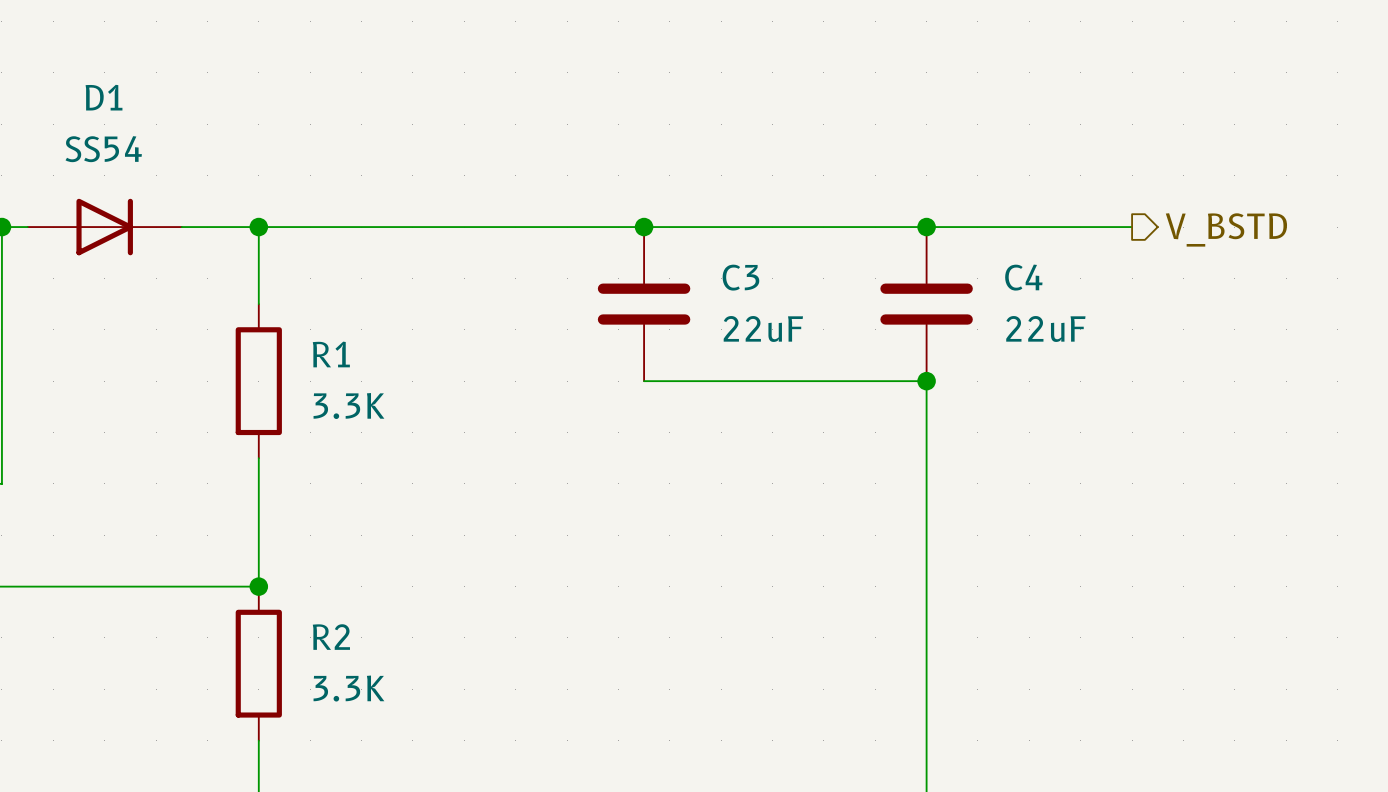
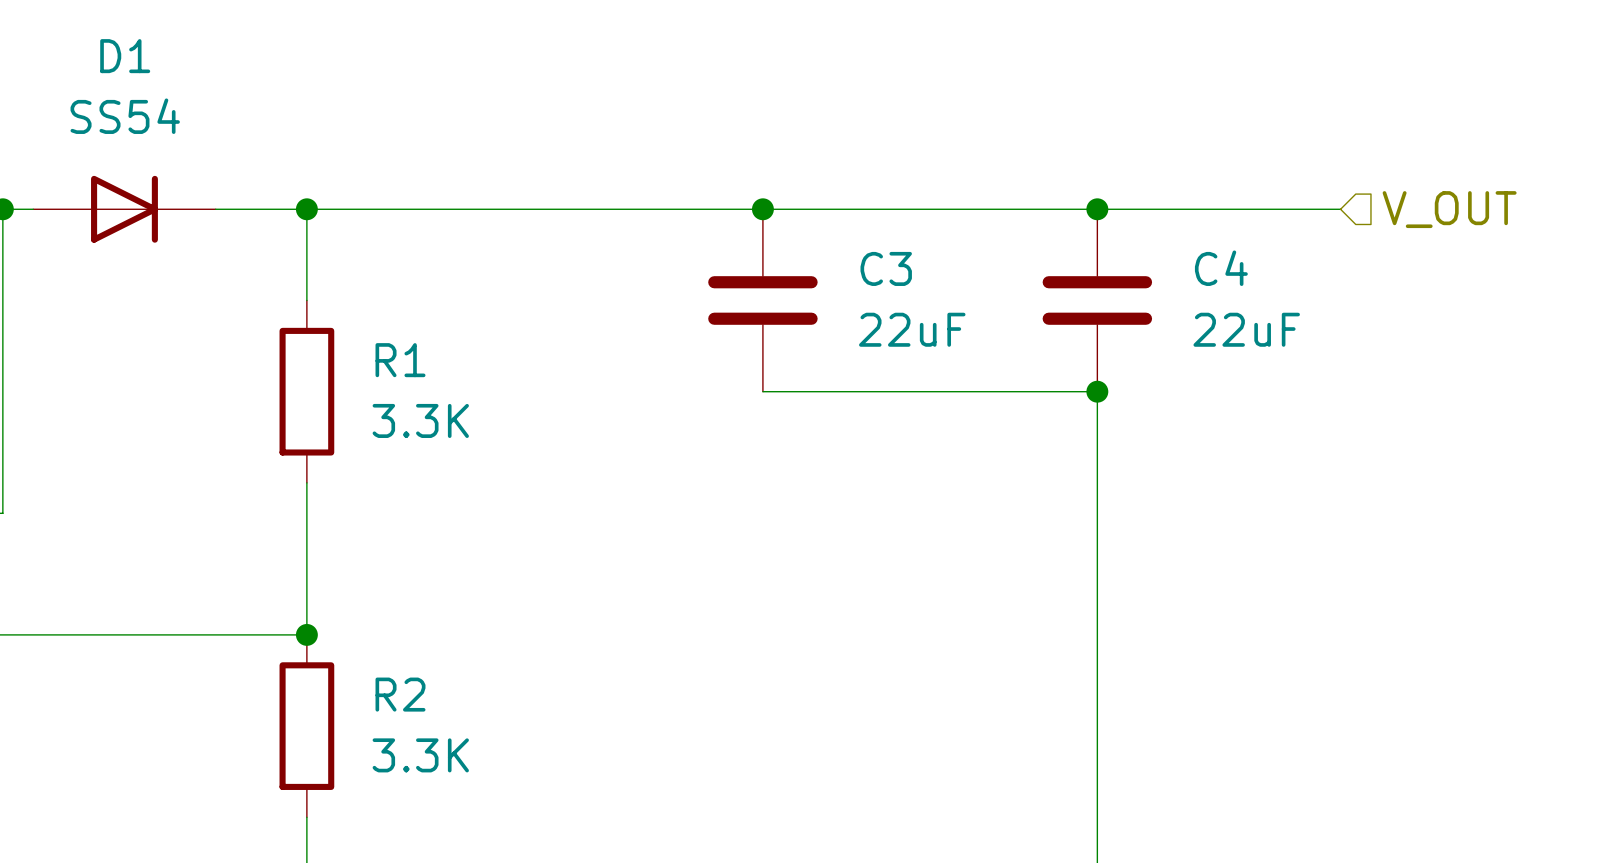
hierarchical label shape: output (1226, 229) -> input (1449, 209)
hierarchical label: V_BSTD (1226, 229) -> V_OUT (1449, 209)

